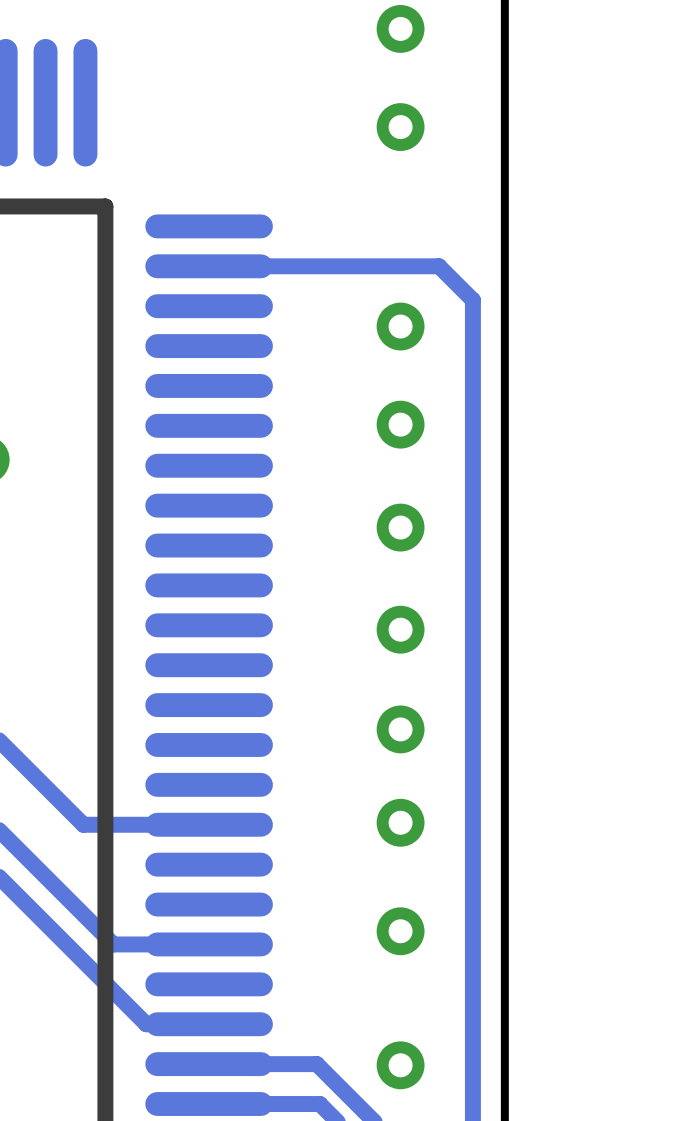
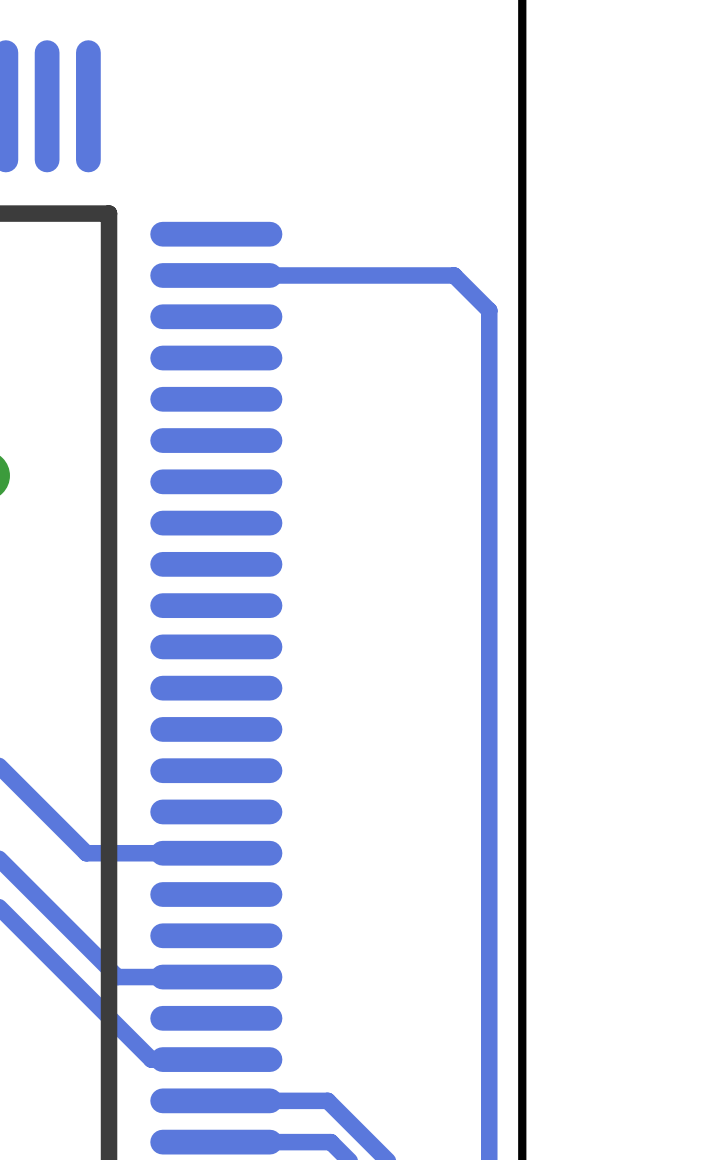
via: (400, 28) -> none
via: (400, 127) -> none
via: (400, 326) -> none
via: (400, 424) -> none
via: (400, 527) -> none
via: (400, 629) -> none
via: (400, 729) -> none
via: (400, 822) -> none
via: (400, 931) -> none
via: (400, 1065) -> none

